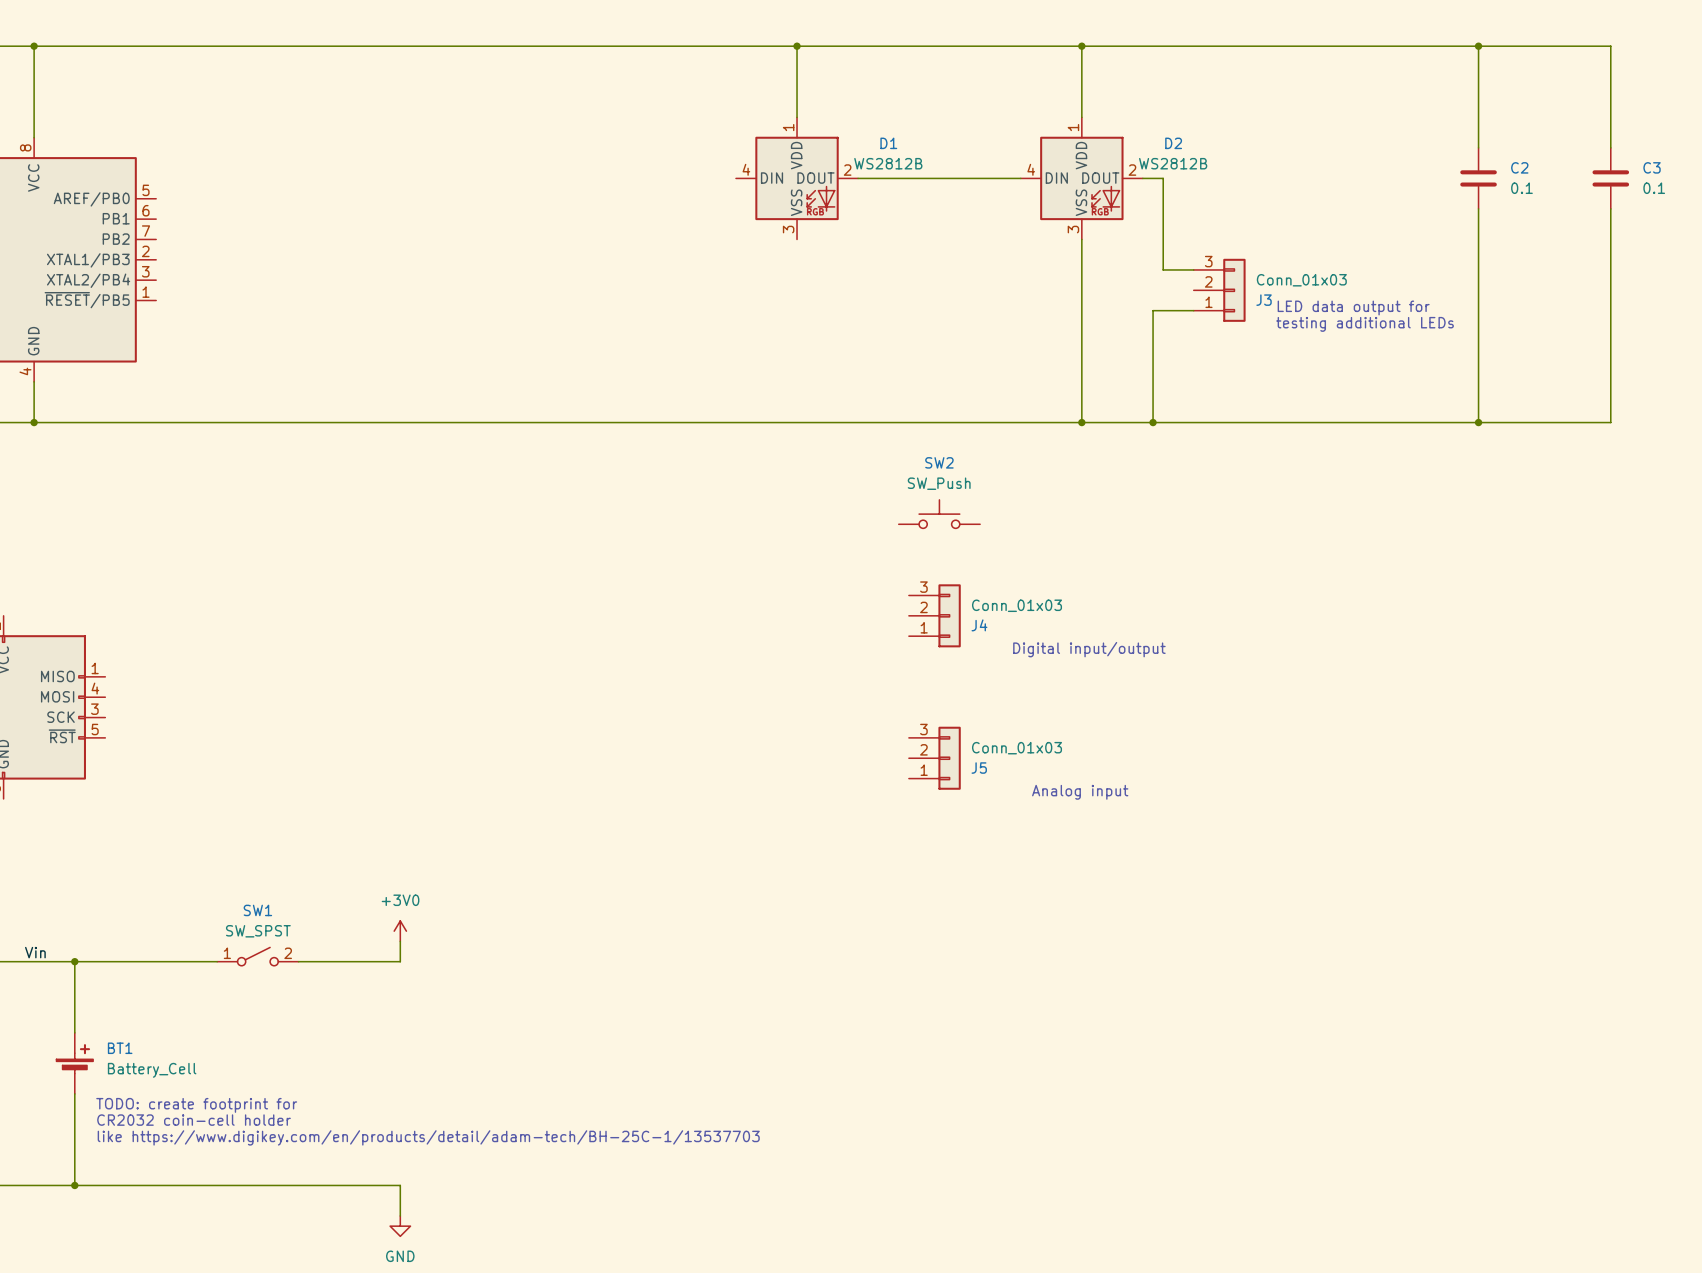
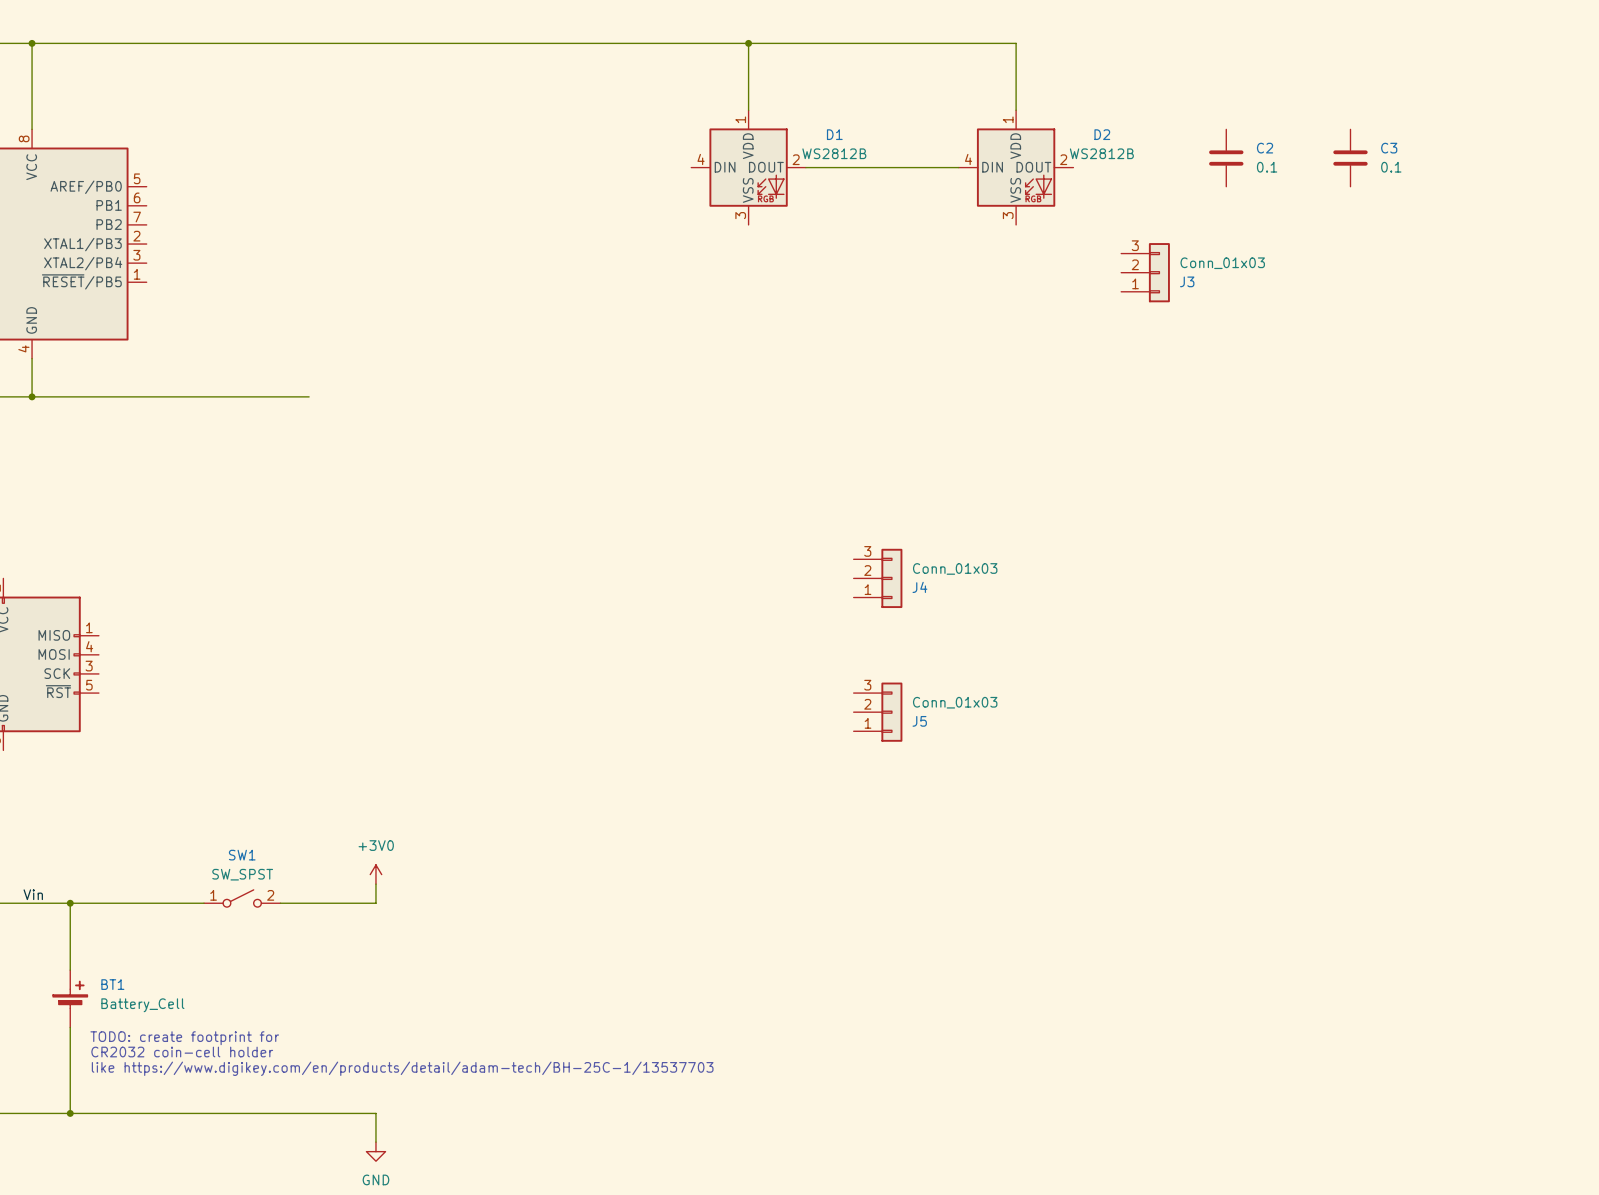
wire: (1081, 46) (1610, 46) (1610, 147) -> none
junction: (1081, 46) -> none
wire: (1478, 46) (1478, 147) -> none
junction: (1478, 46) -> none
wire: (1142, 178) (1163, 178) (1163, 269) (1193, 269) -> none
C2 position: (1478, 178) -> (1226, 158)
C3 position: (1610, 178) -> (1350, 158)
wire: (1478, 208) (1478, 422) -> none
wire: (1610, 208) (1610, 422) (329, 422) -> none
wire: (1081, 239) (1081, 422) -> none
text: LED data output for (1353, 308) -> none
wire: (1193, 310) (1153, 310) (1153, 422) -> none
text: testing additional LEDs (1365, 324) -> none
junction: (1081, 422) -> none
junction: (1153, 422) -> none
junction: (1478, 422) -> none
SW2: SW_Push (939, 514) -> none
text: Digital input/output (1089, 649) -> none
text: Analog input (1080, 792) -> none

